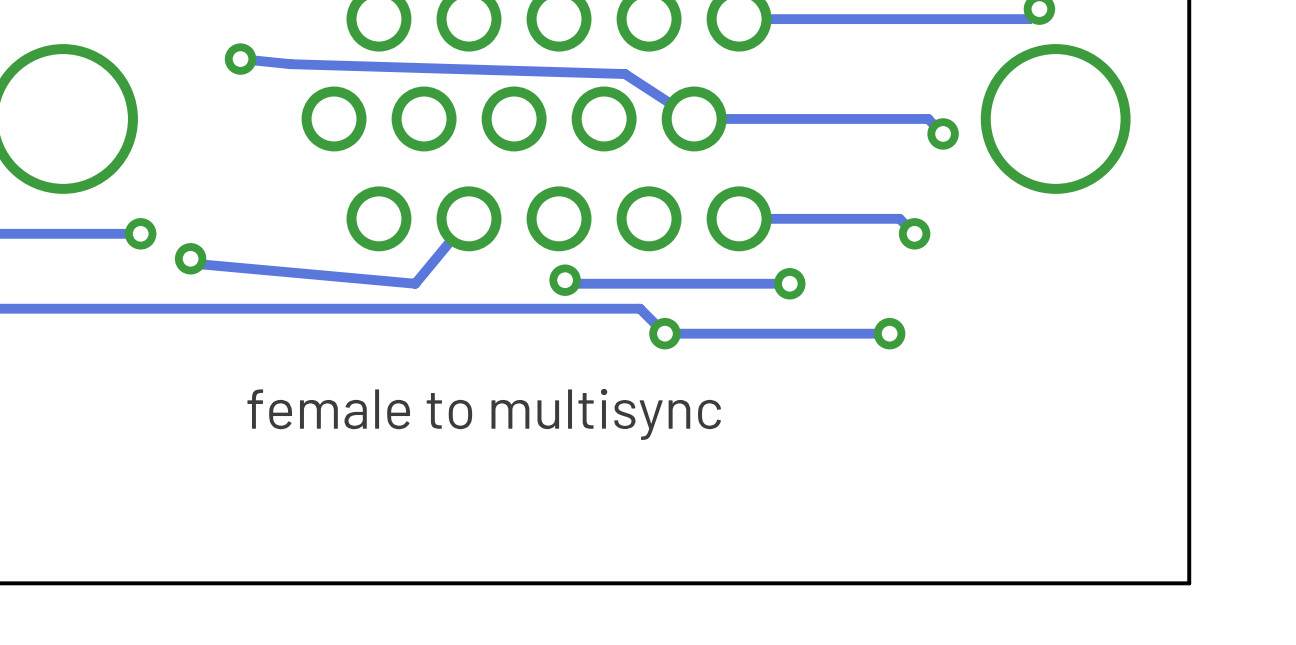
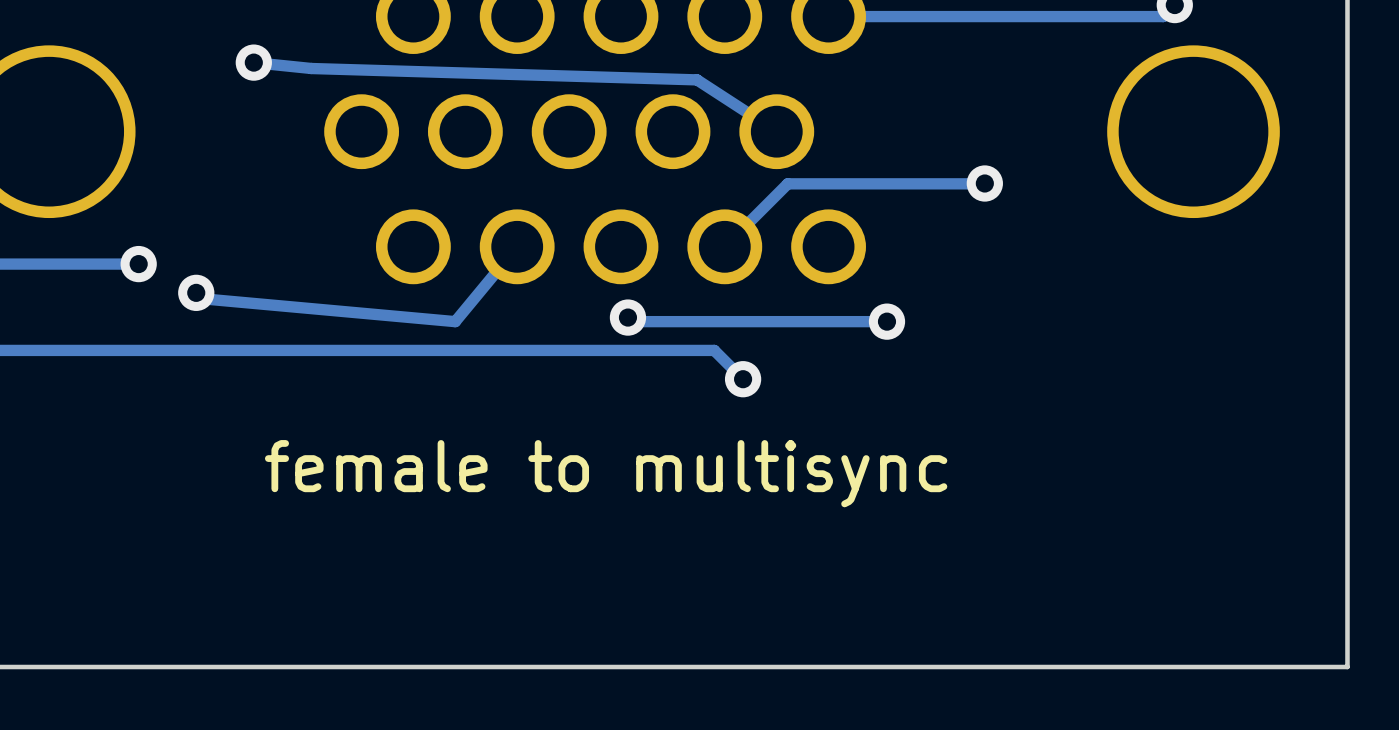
track: (694, 118) (928, 118) (943, 133) -> none
via: (943, 133) -> none
via: none -> (984, 183)
track: none -> (984, 183) (787, 183) (724, 246)
track: (739, 218) (899, 218) (914, 233) -> none
via: (914, 233) -> none
track: (889, 333) (664, 333) -> none
via: (889, 333) -> none

